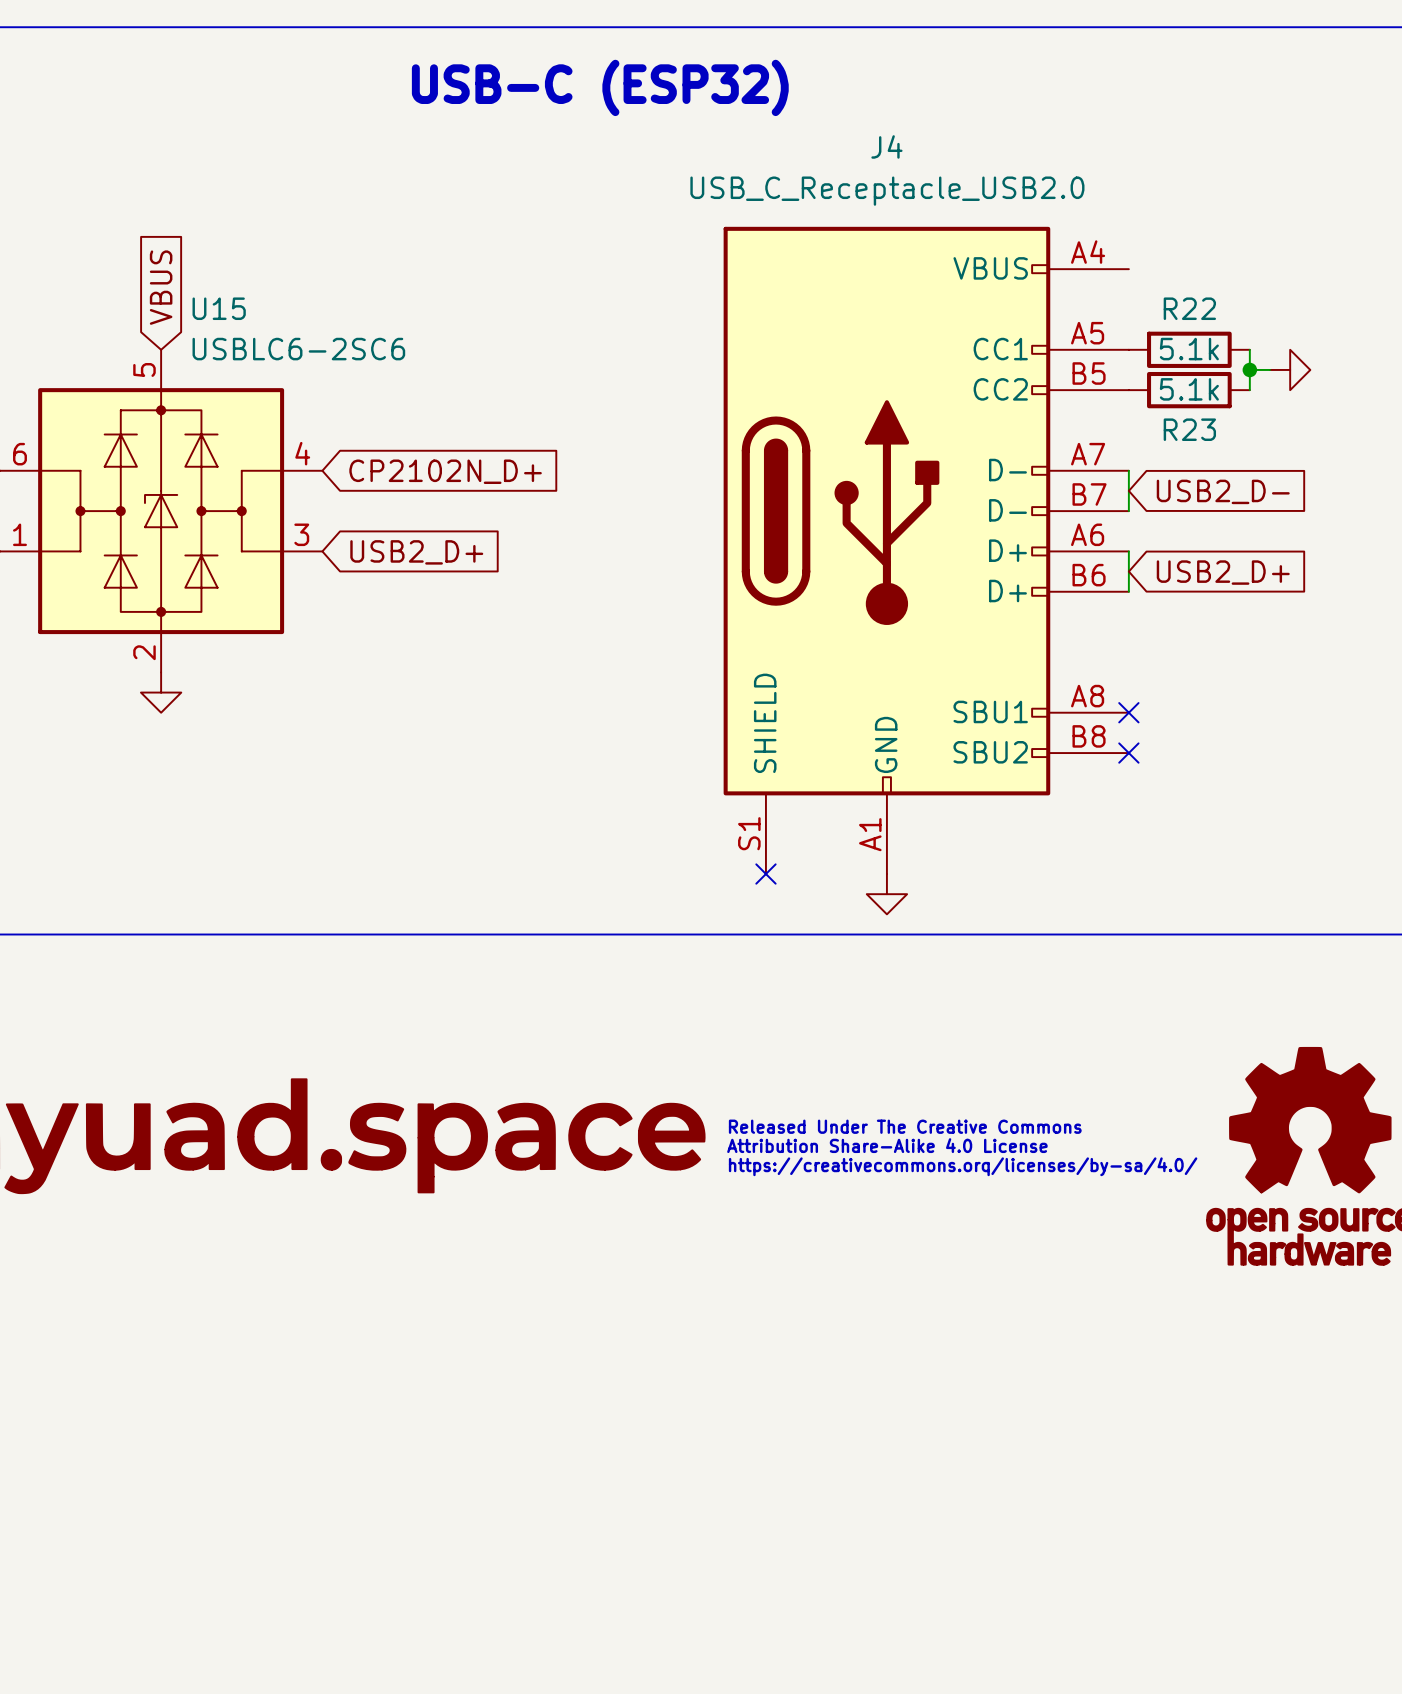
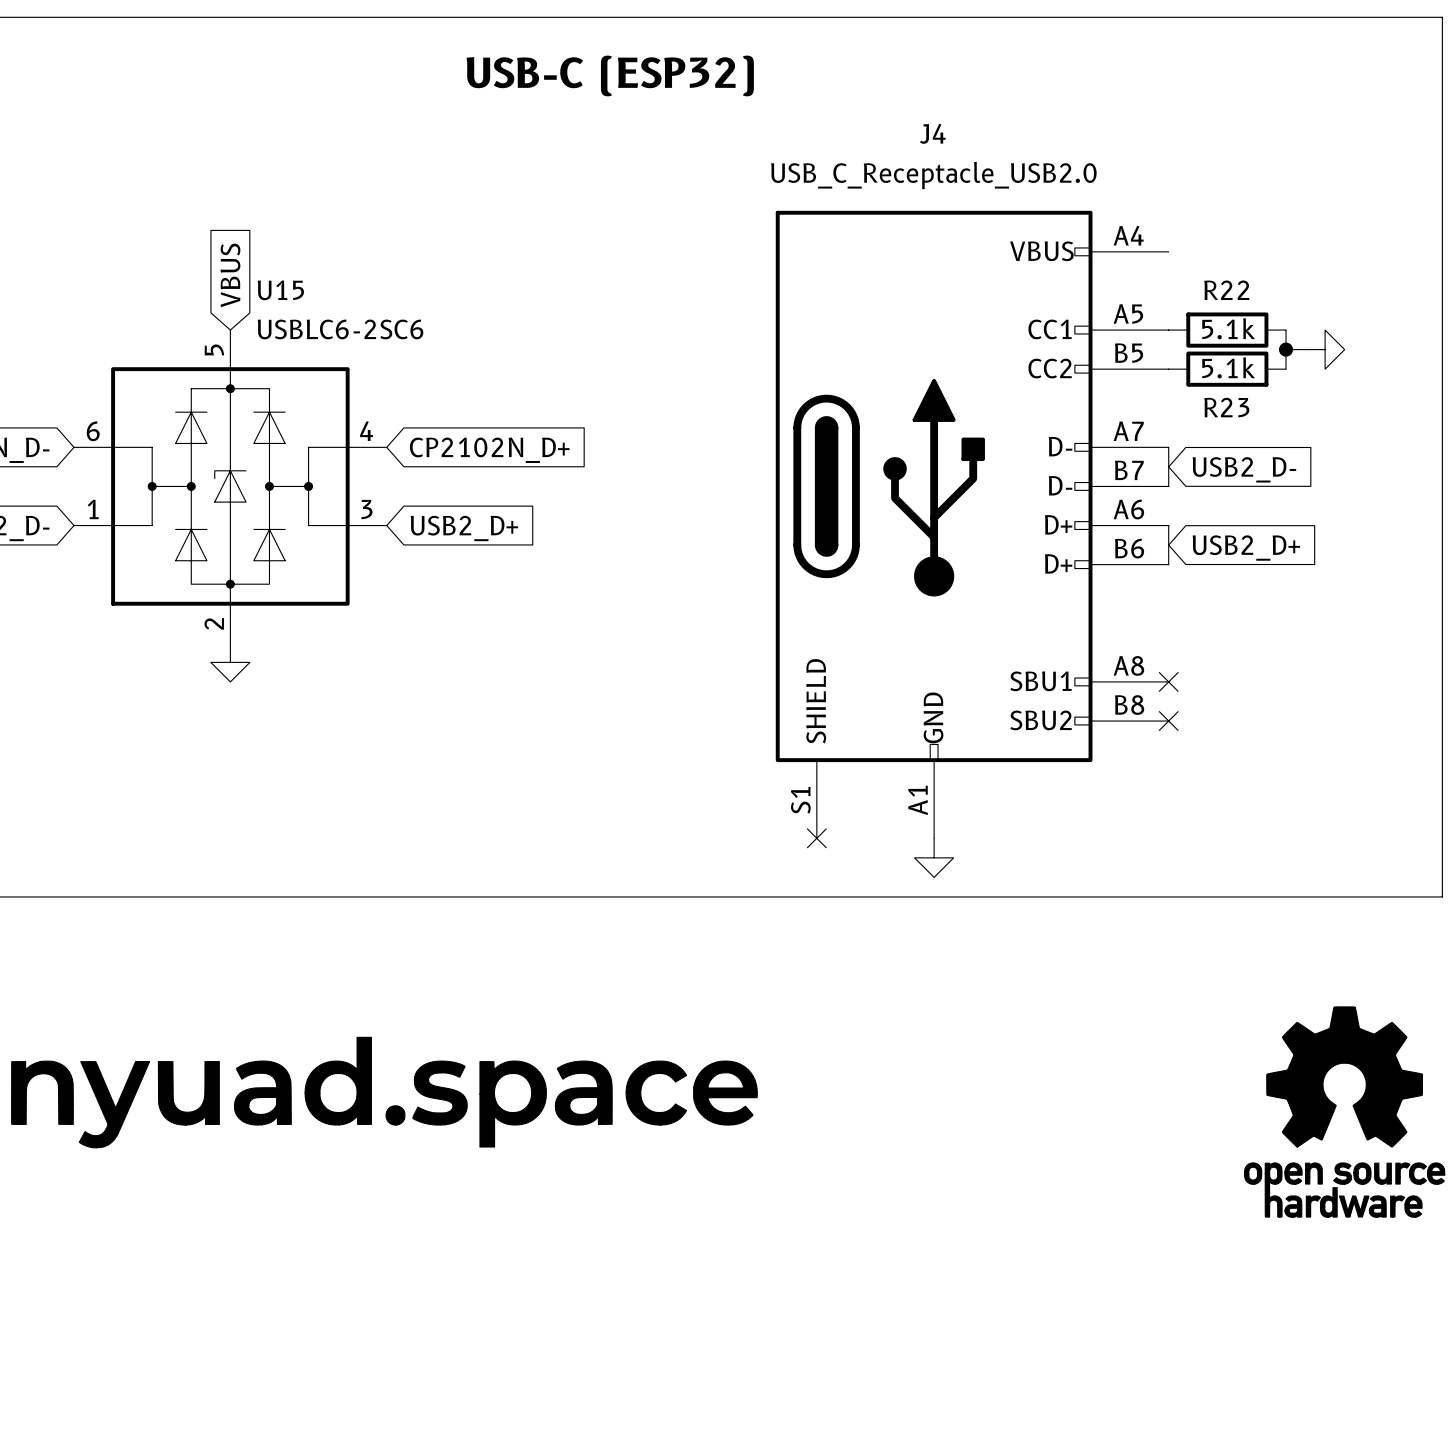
text: Released Under The Creative Commons (905, 1126) -> none
text: Attribution Share-Alike 4.0 License (887, 1145) -> none
text: https://creativecommons.orq/licenses/by-sa/4.0/ (963, 1166) -> none

